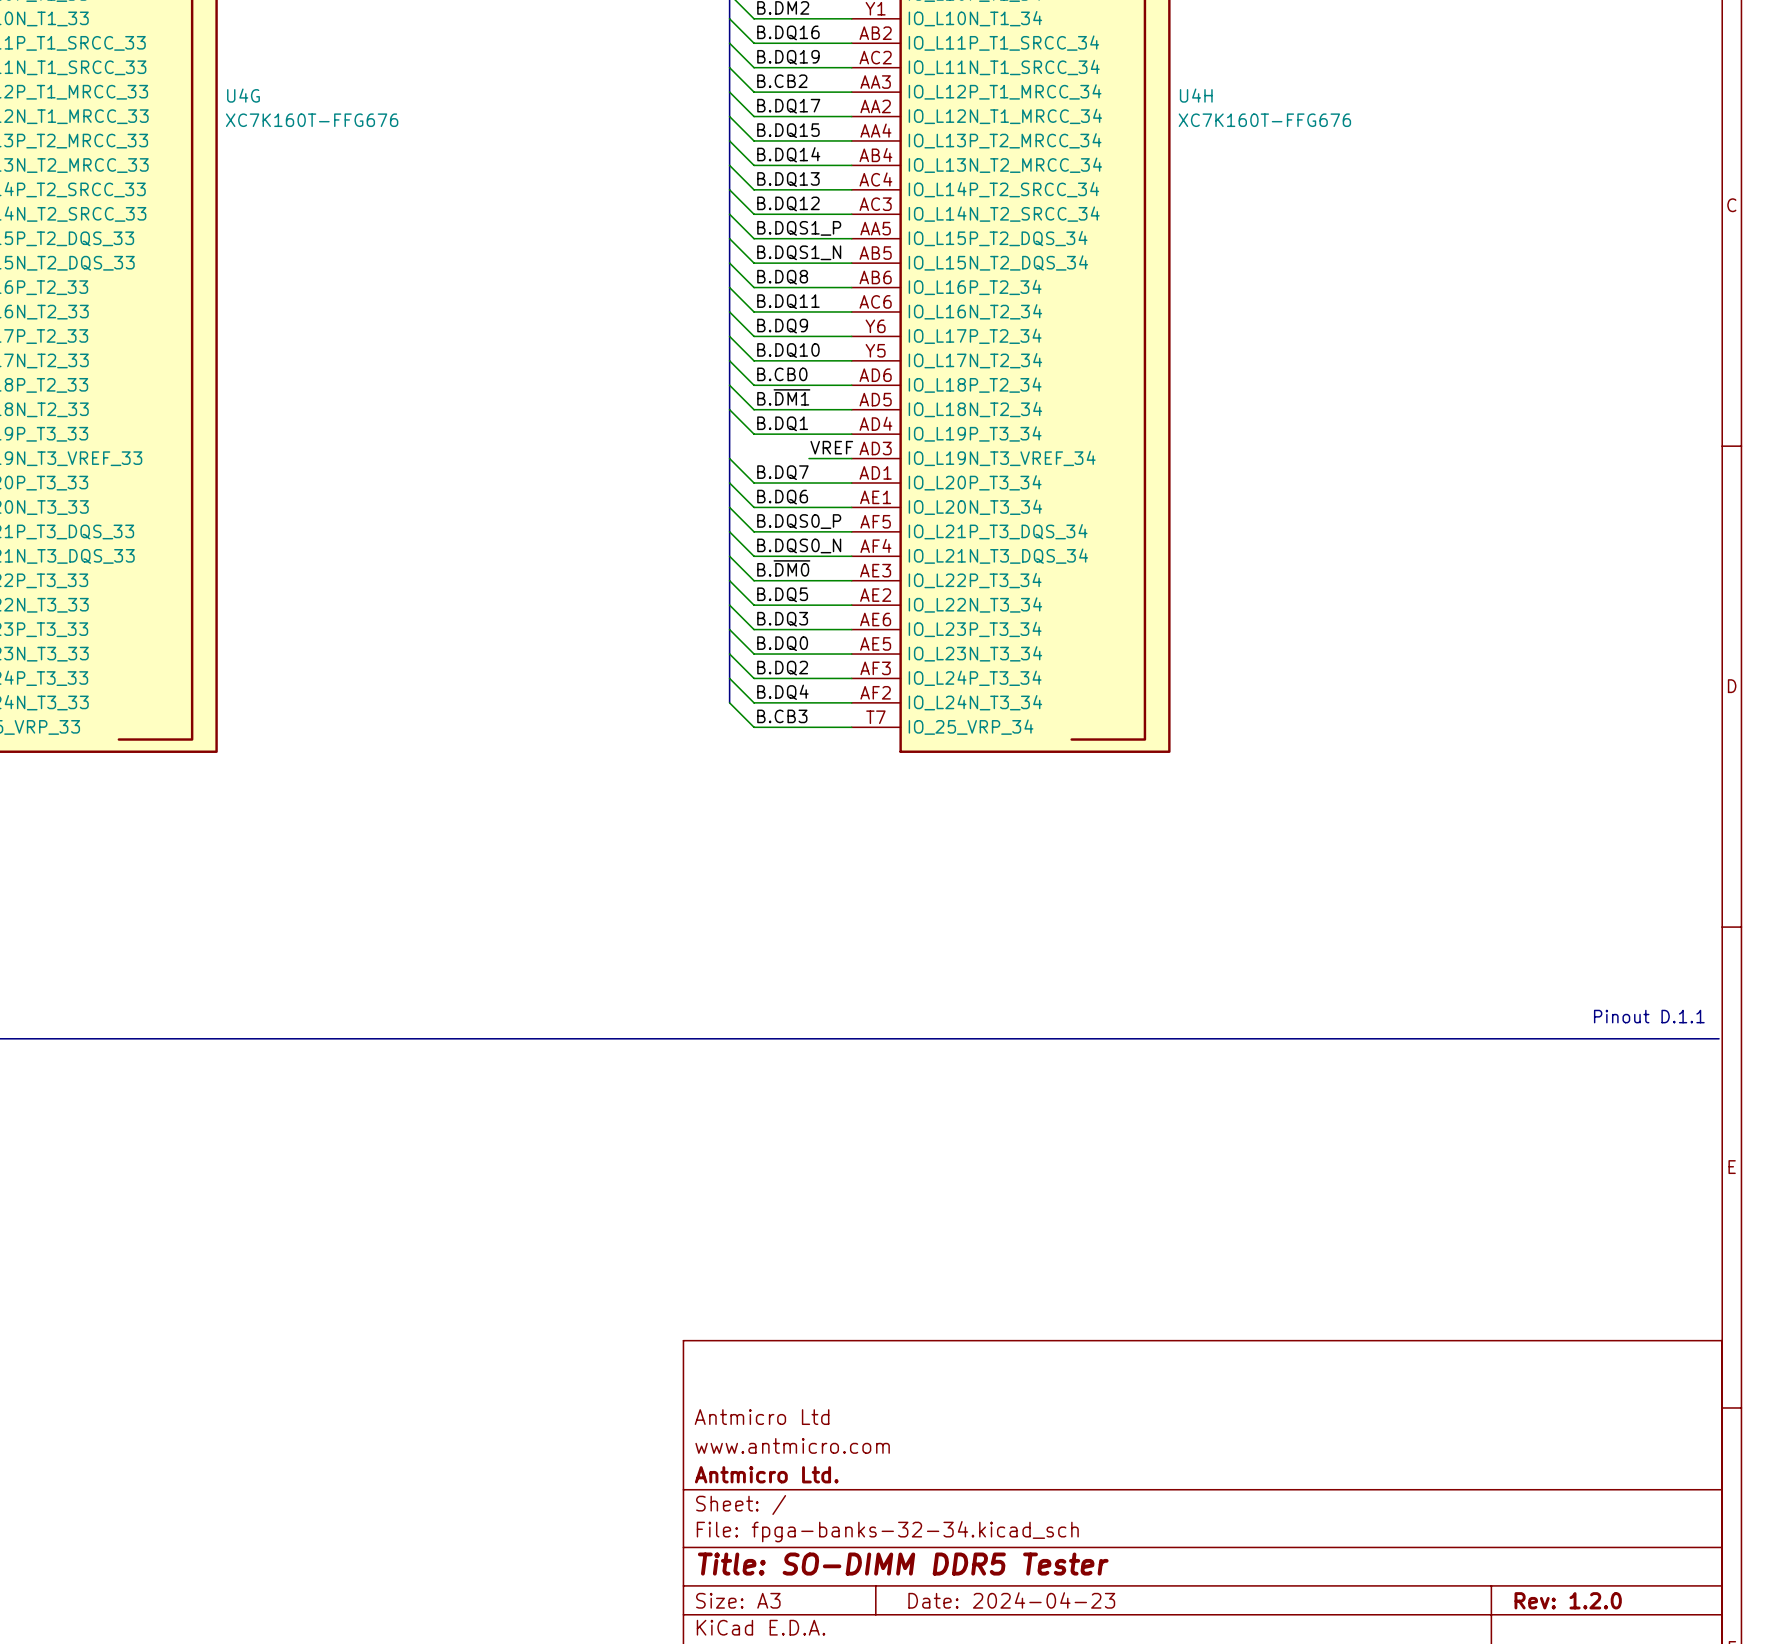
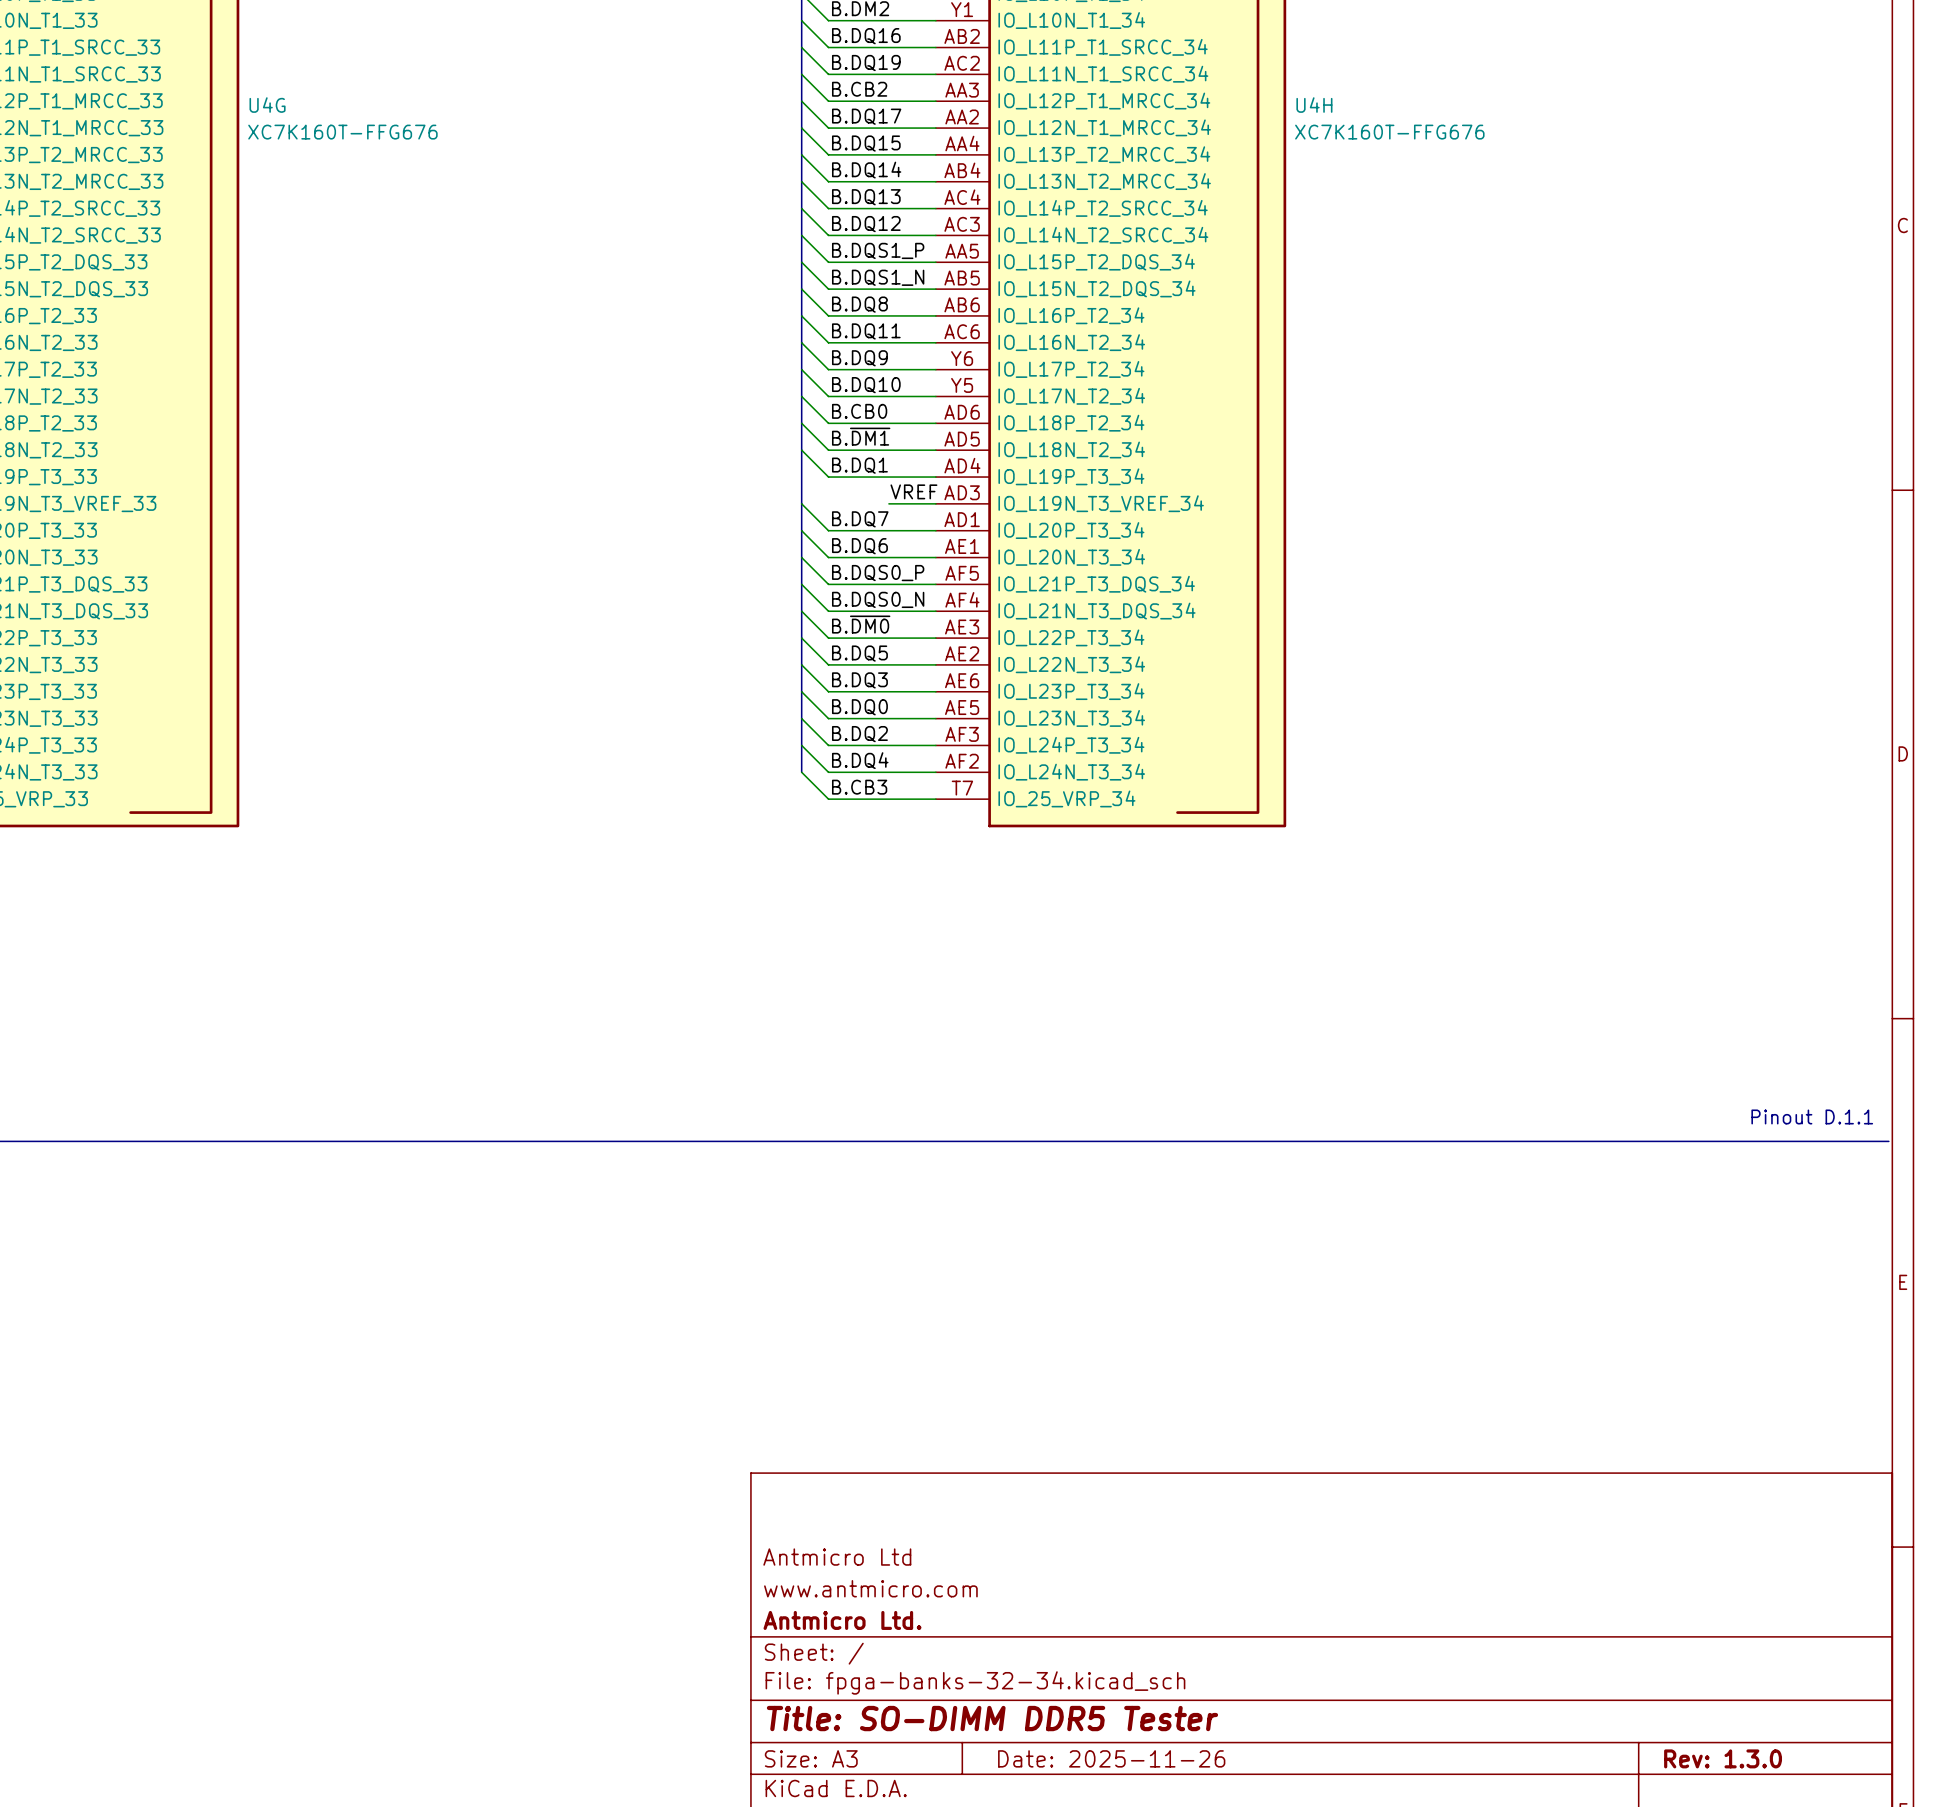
title block: Date: 2024-04-23 (1011, 1600) -> Date: 2025-11-26 (1111, 1758)
title block: Rev: 1.2.0 (1568, 1600) -> Rev: 1.3.0 (1723, 1758)

